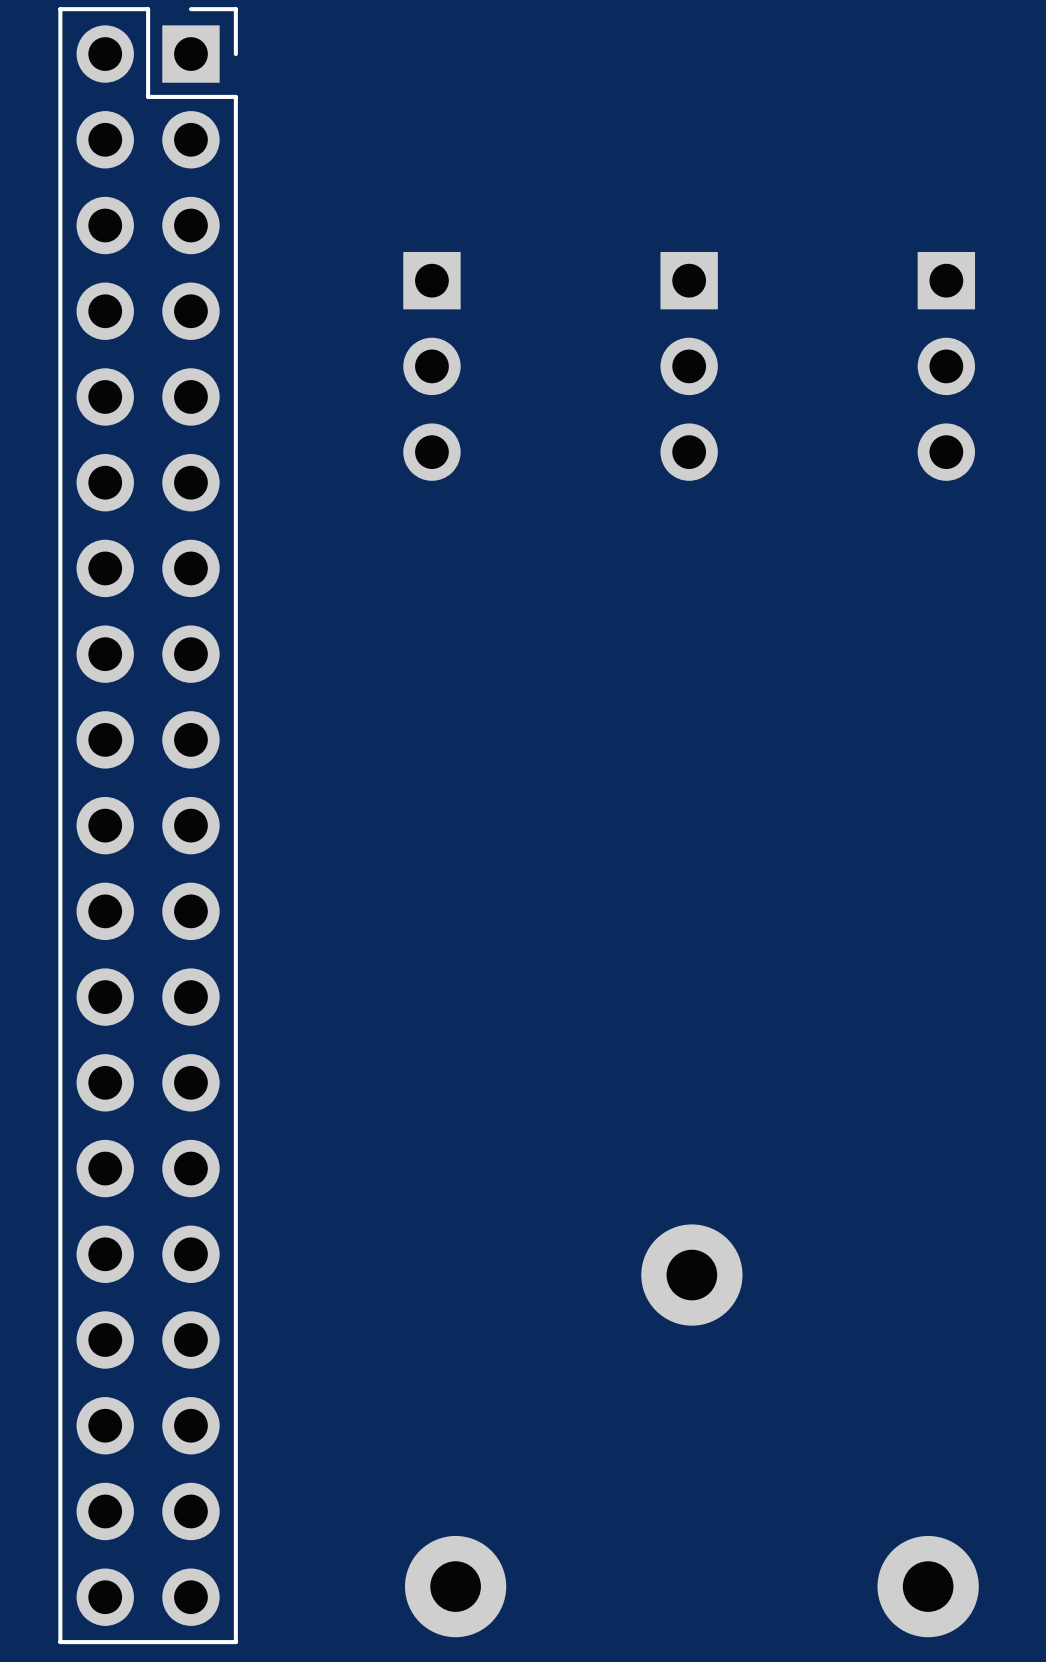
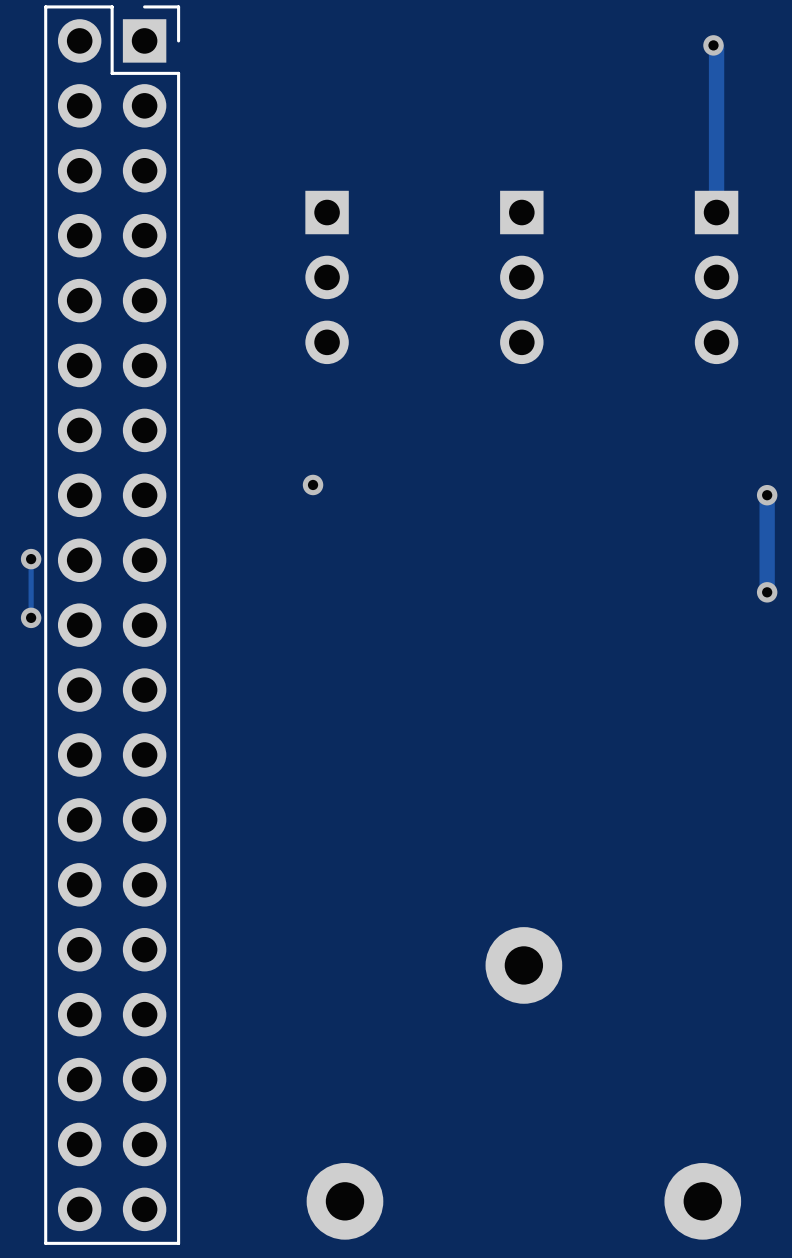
track: none -> (713, 45) (716, 48) (716, 212)
via: none -> (713, 45)
via: none -> (313, 484)
track: none -> (767, 495) (767, 592)
via: none -> (767, 495)
track: none -> (31, 559) (31, 617)
via: none -> (31, 559)
via: none -> (767, 592)
via: none -> (31, 617)

